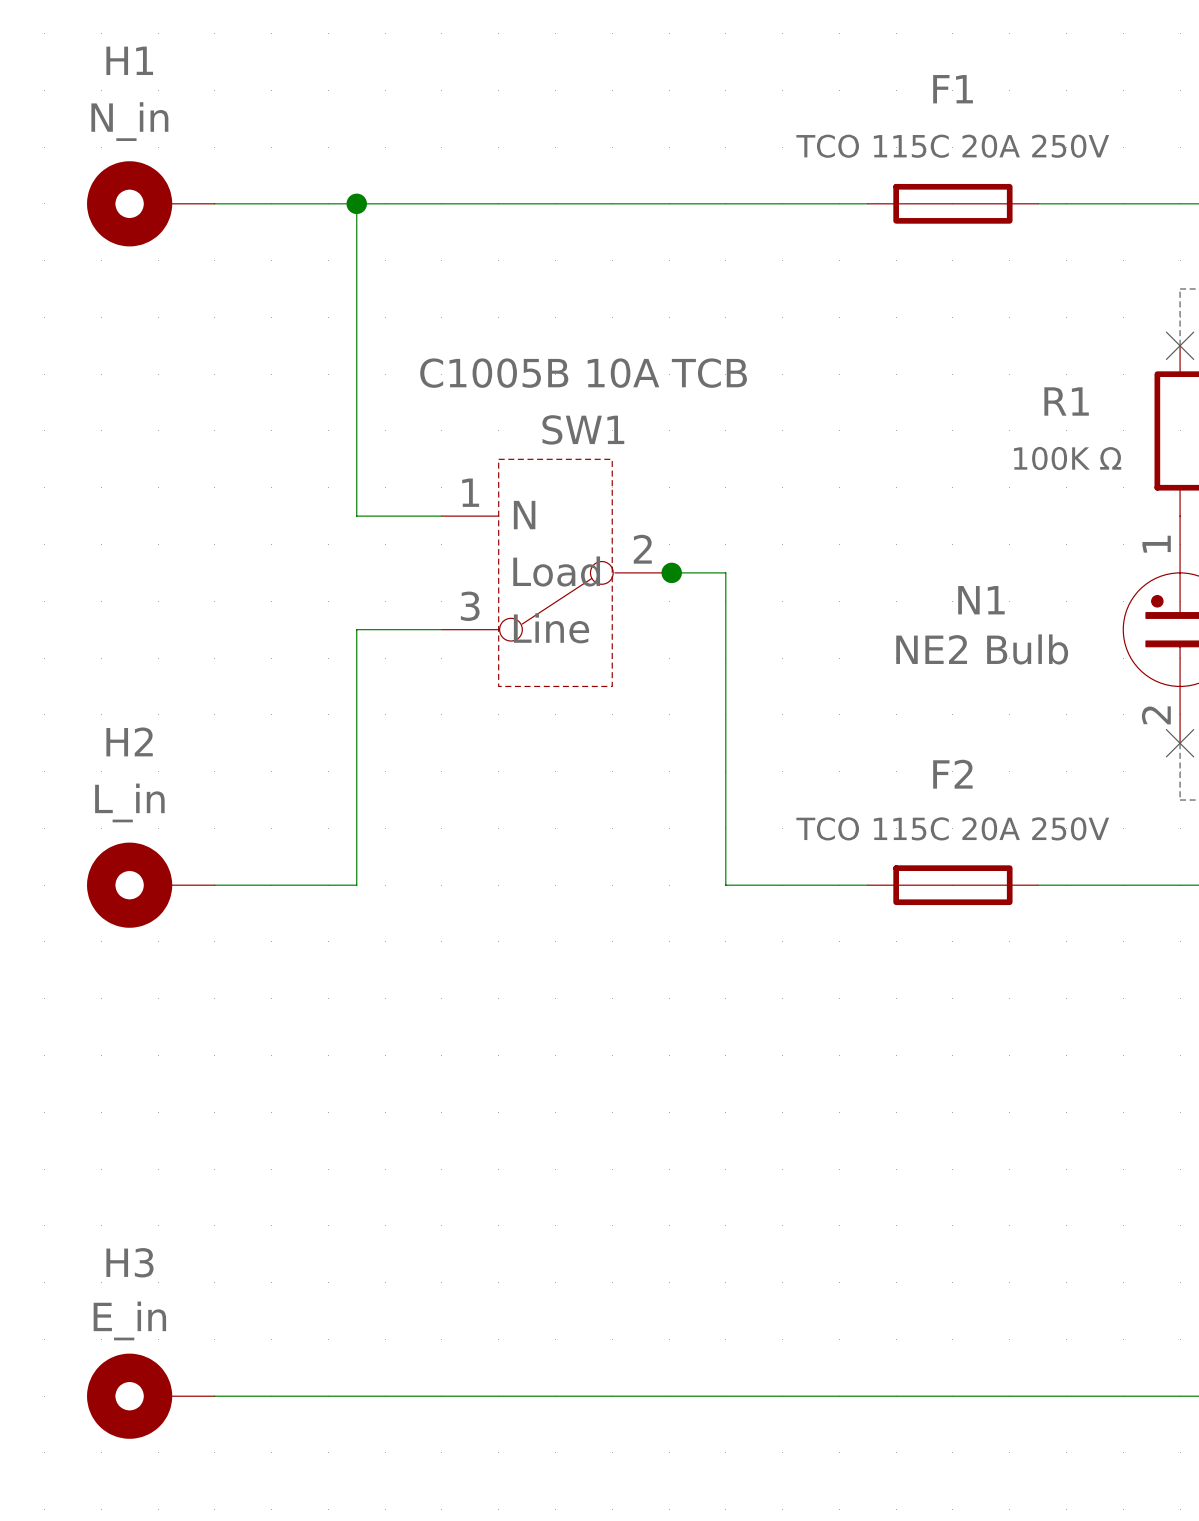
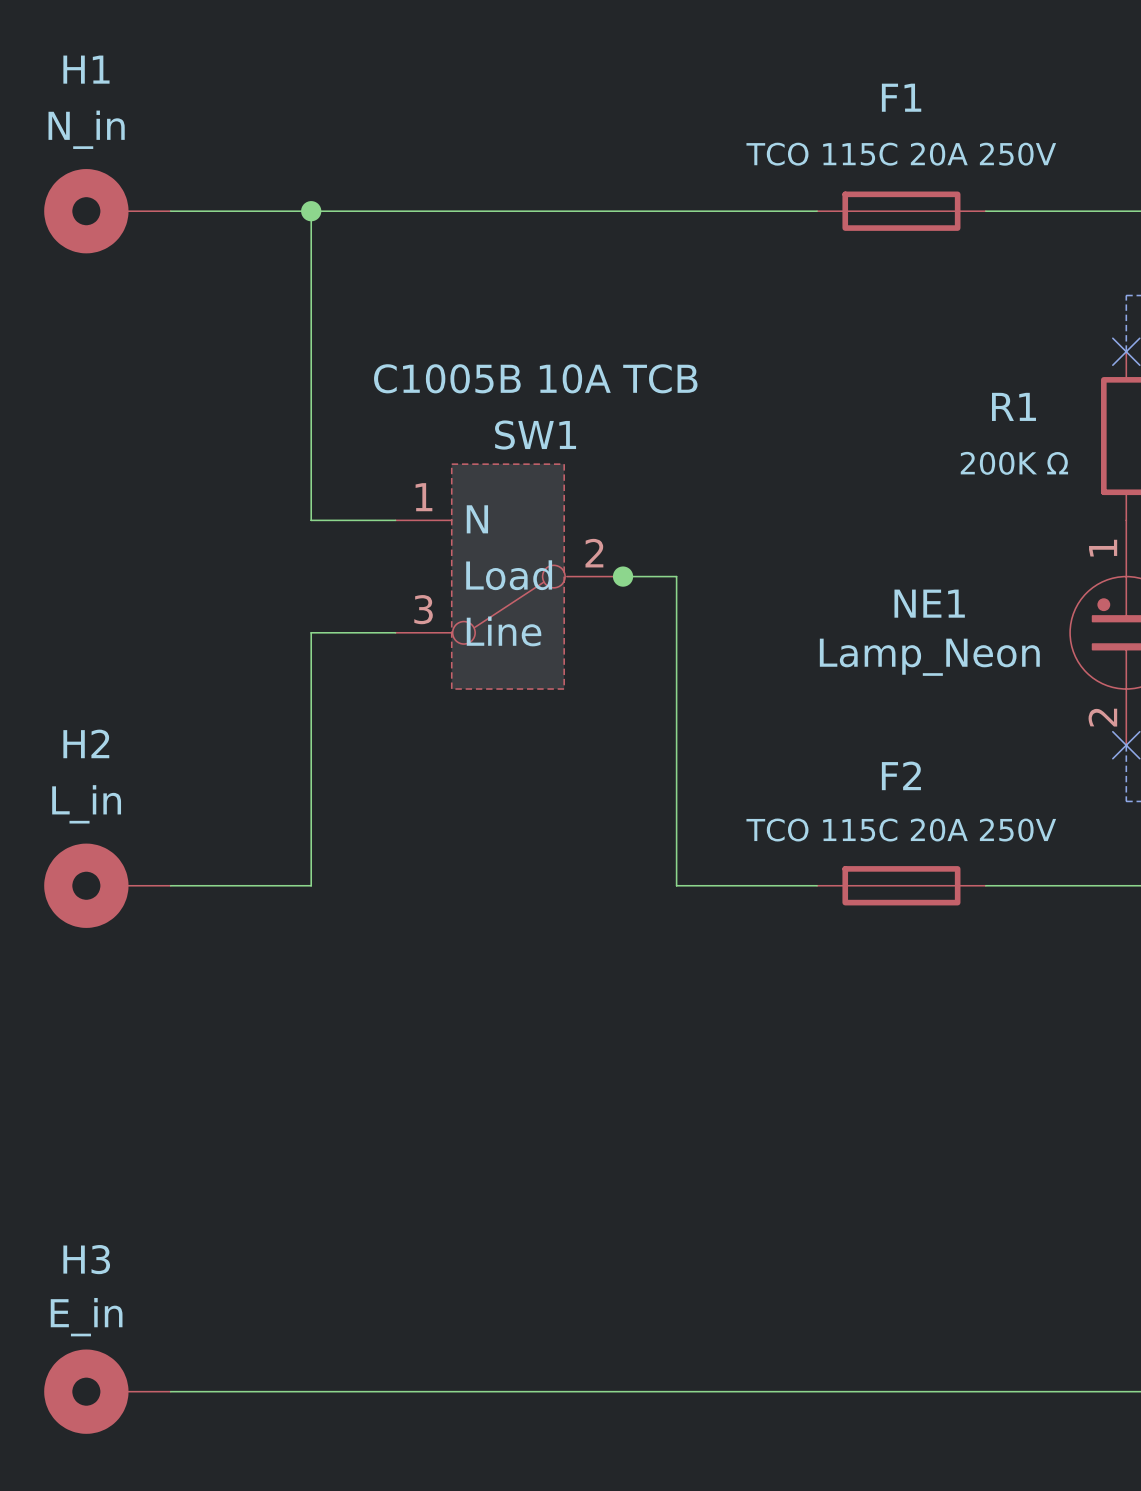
R1 value: 100K Ω (1067, 458) -> 200K Ω (1014, 463)
N1 name: N1 (981, 600) -> NE1 (929, 603)
N1 value: NE2 Bulb (982, 649) -> Lamp_Neon (929, 657)

